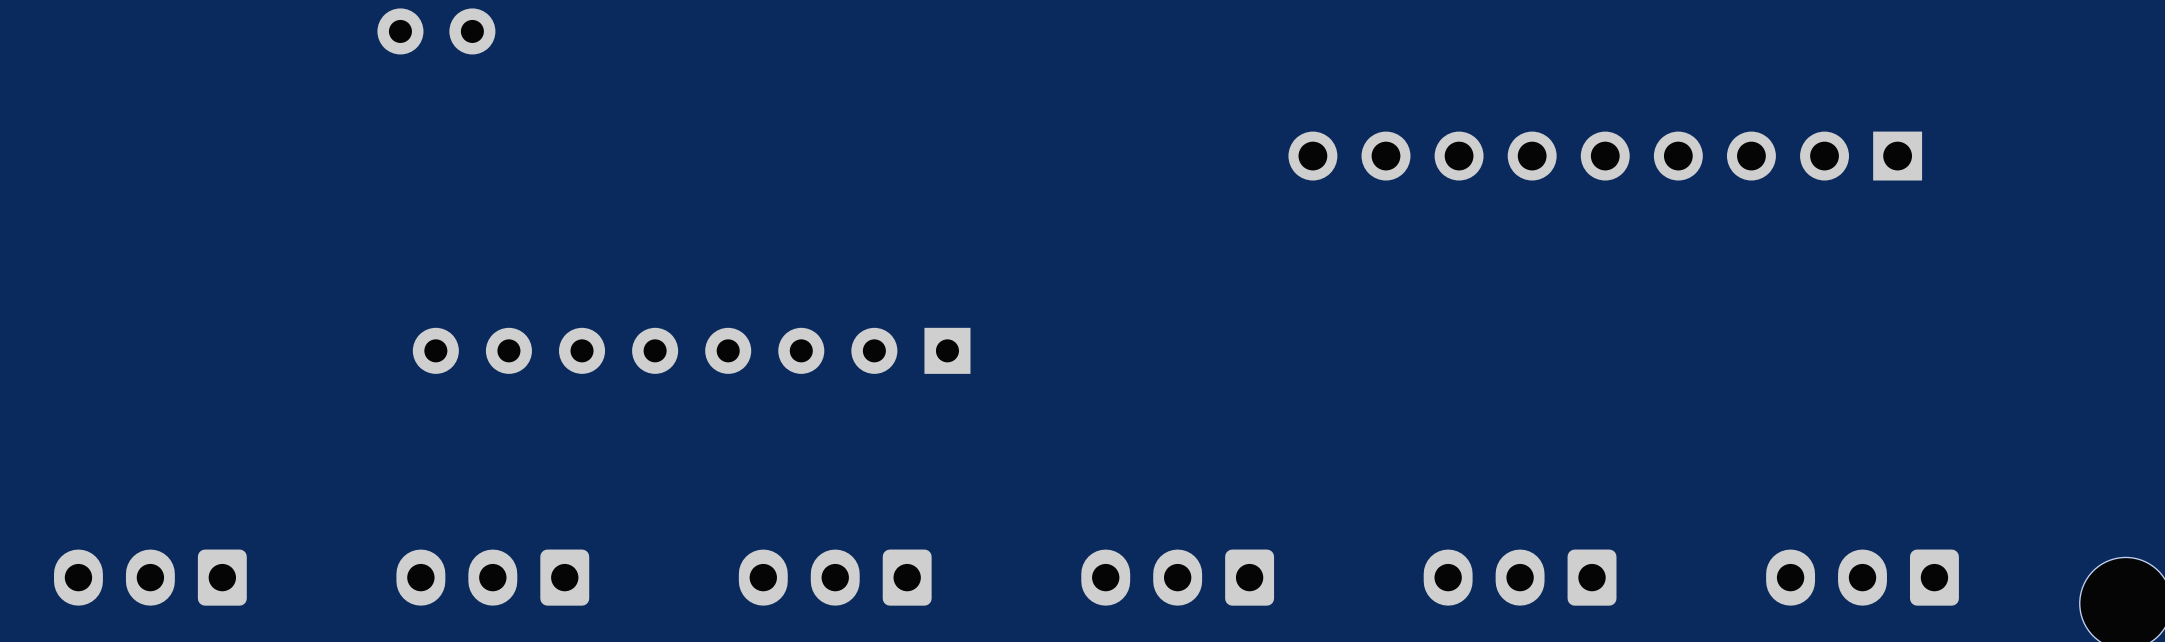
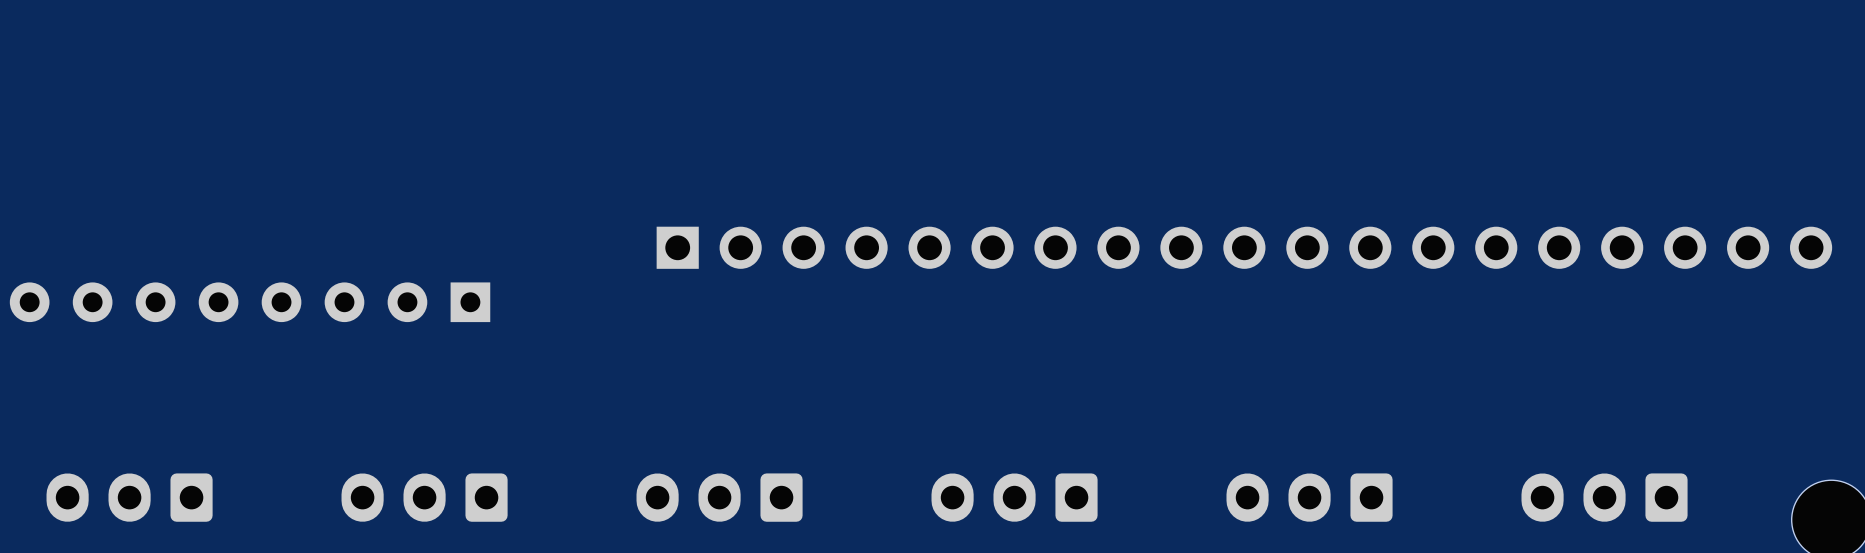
part: (436, 31) -> none
part: (1605, 156) -> none
part: none -> (1244, 247)
part position: (691, 350) -> (250, 302)

